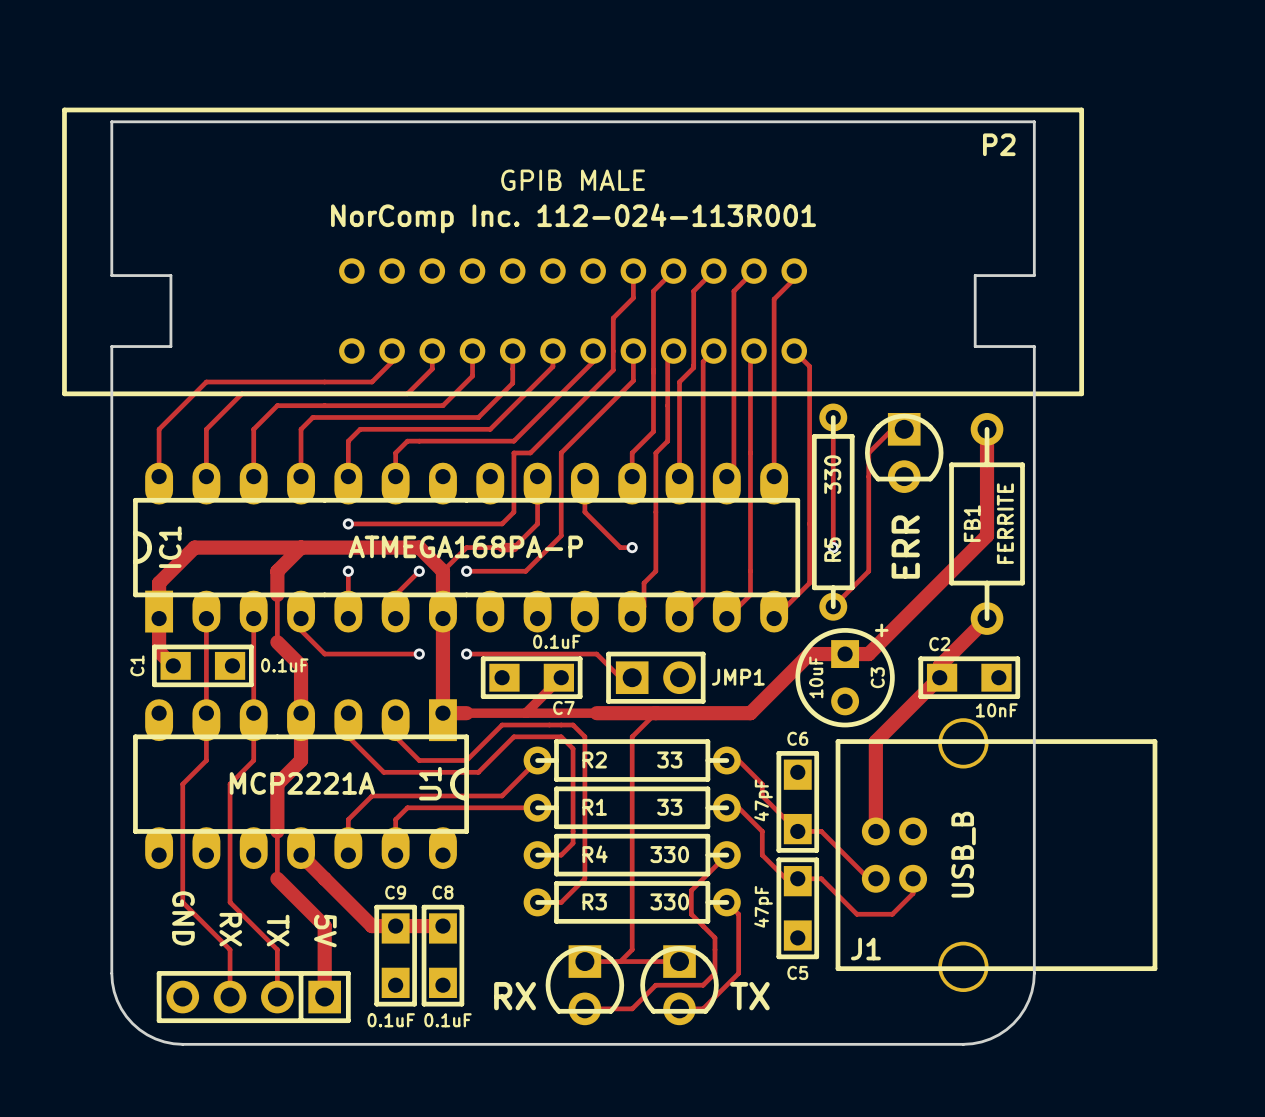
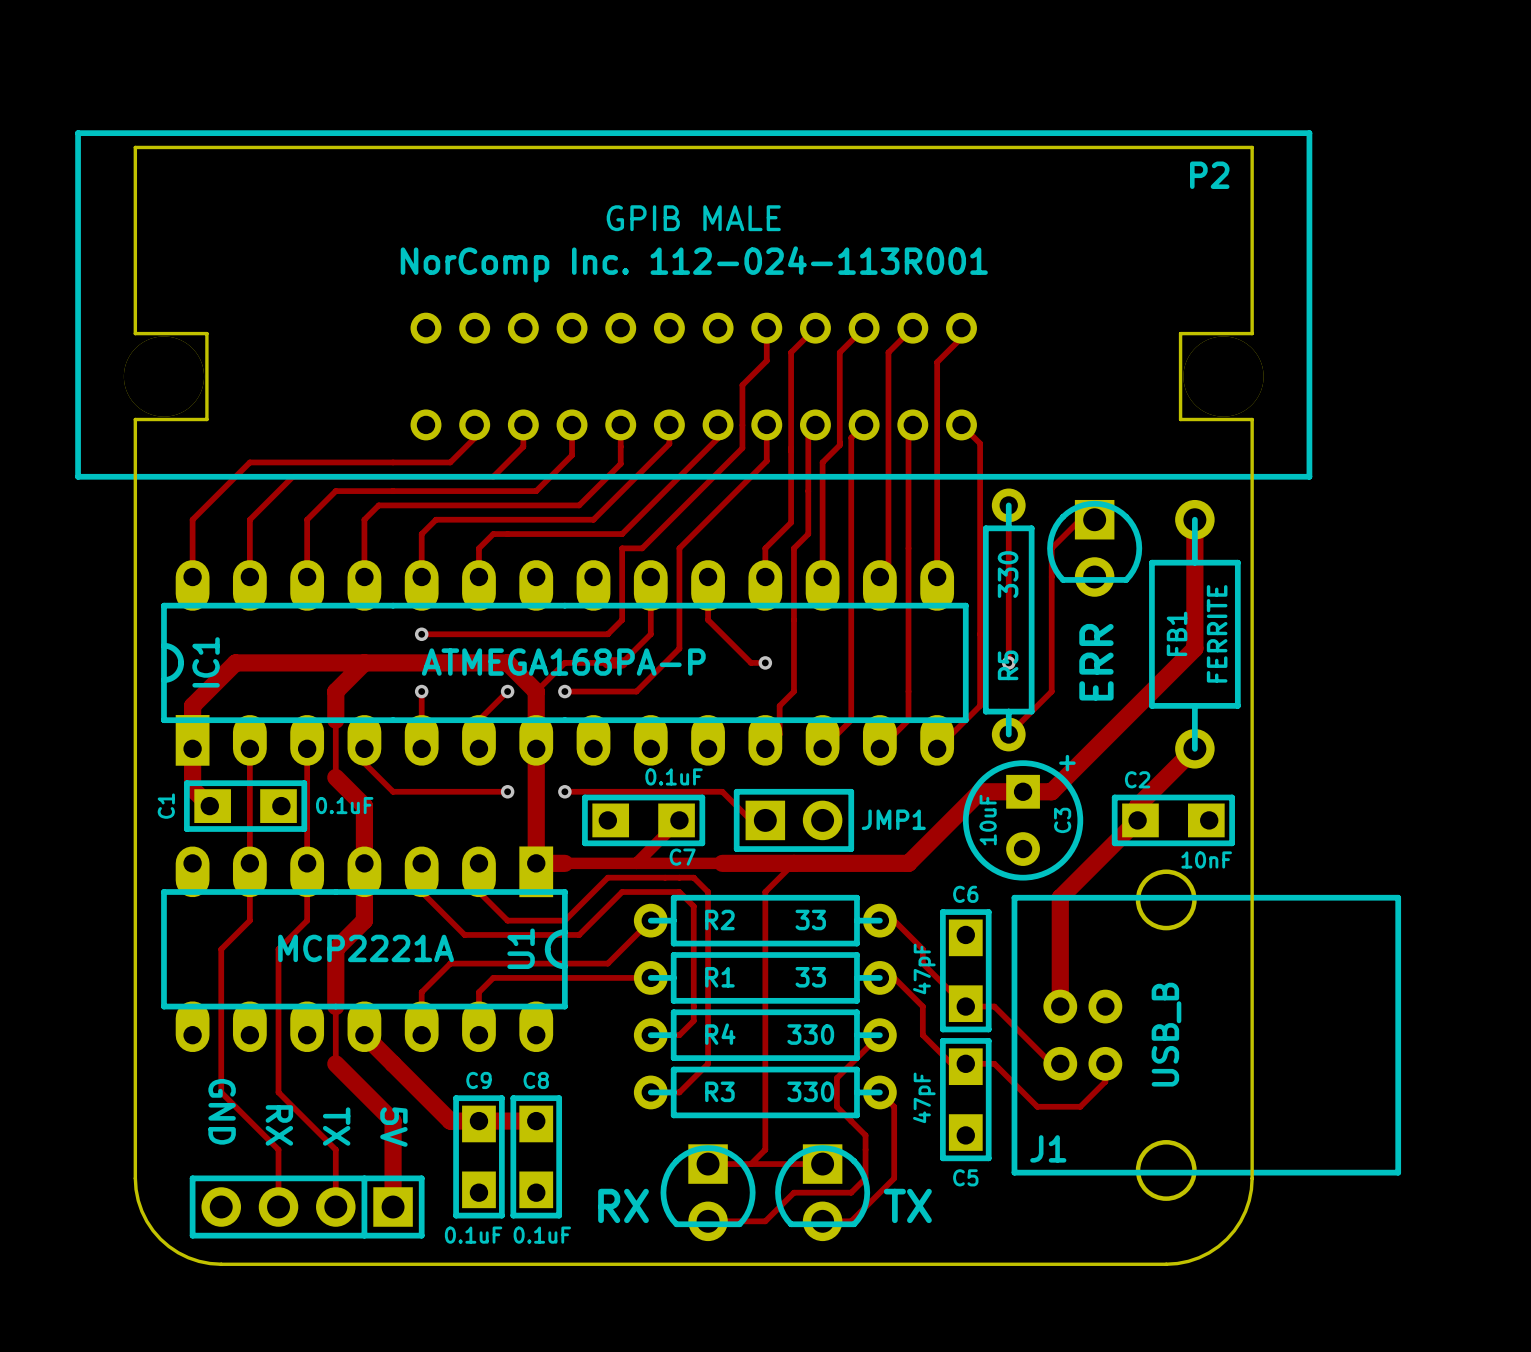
P2 footprint: [62, 107, 1085, 397] -> [75, 130, 1313, 480]

